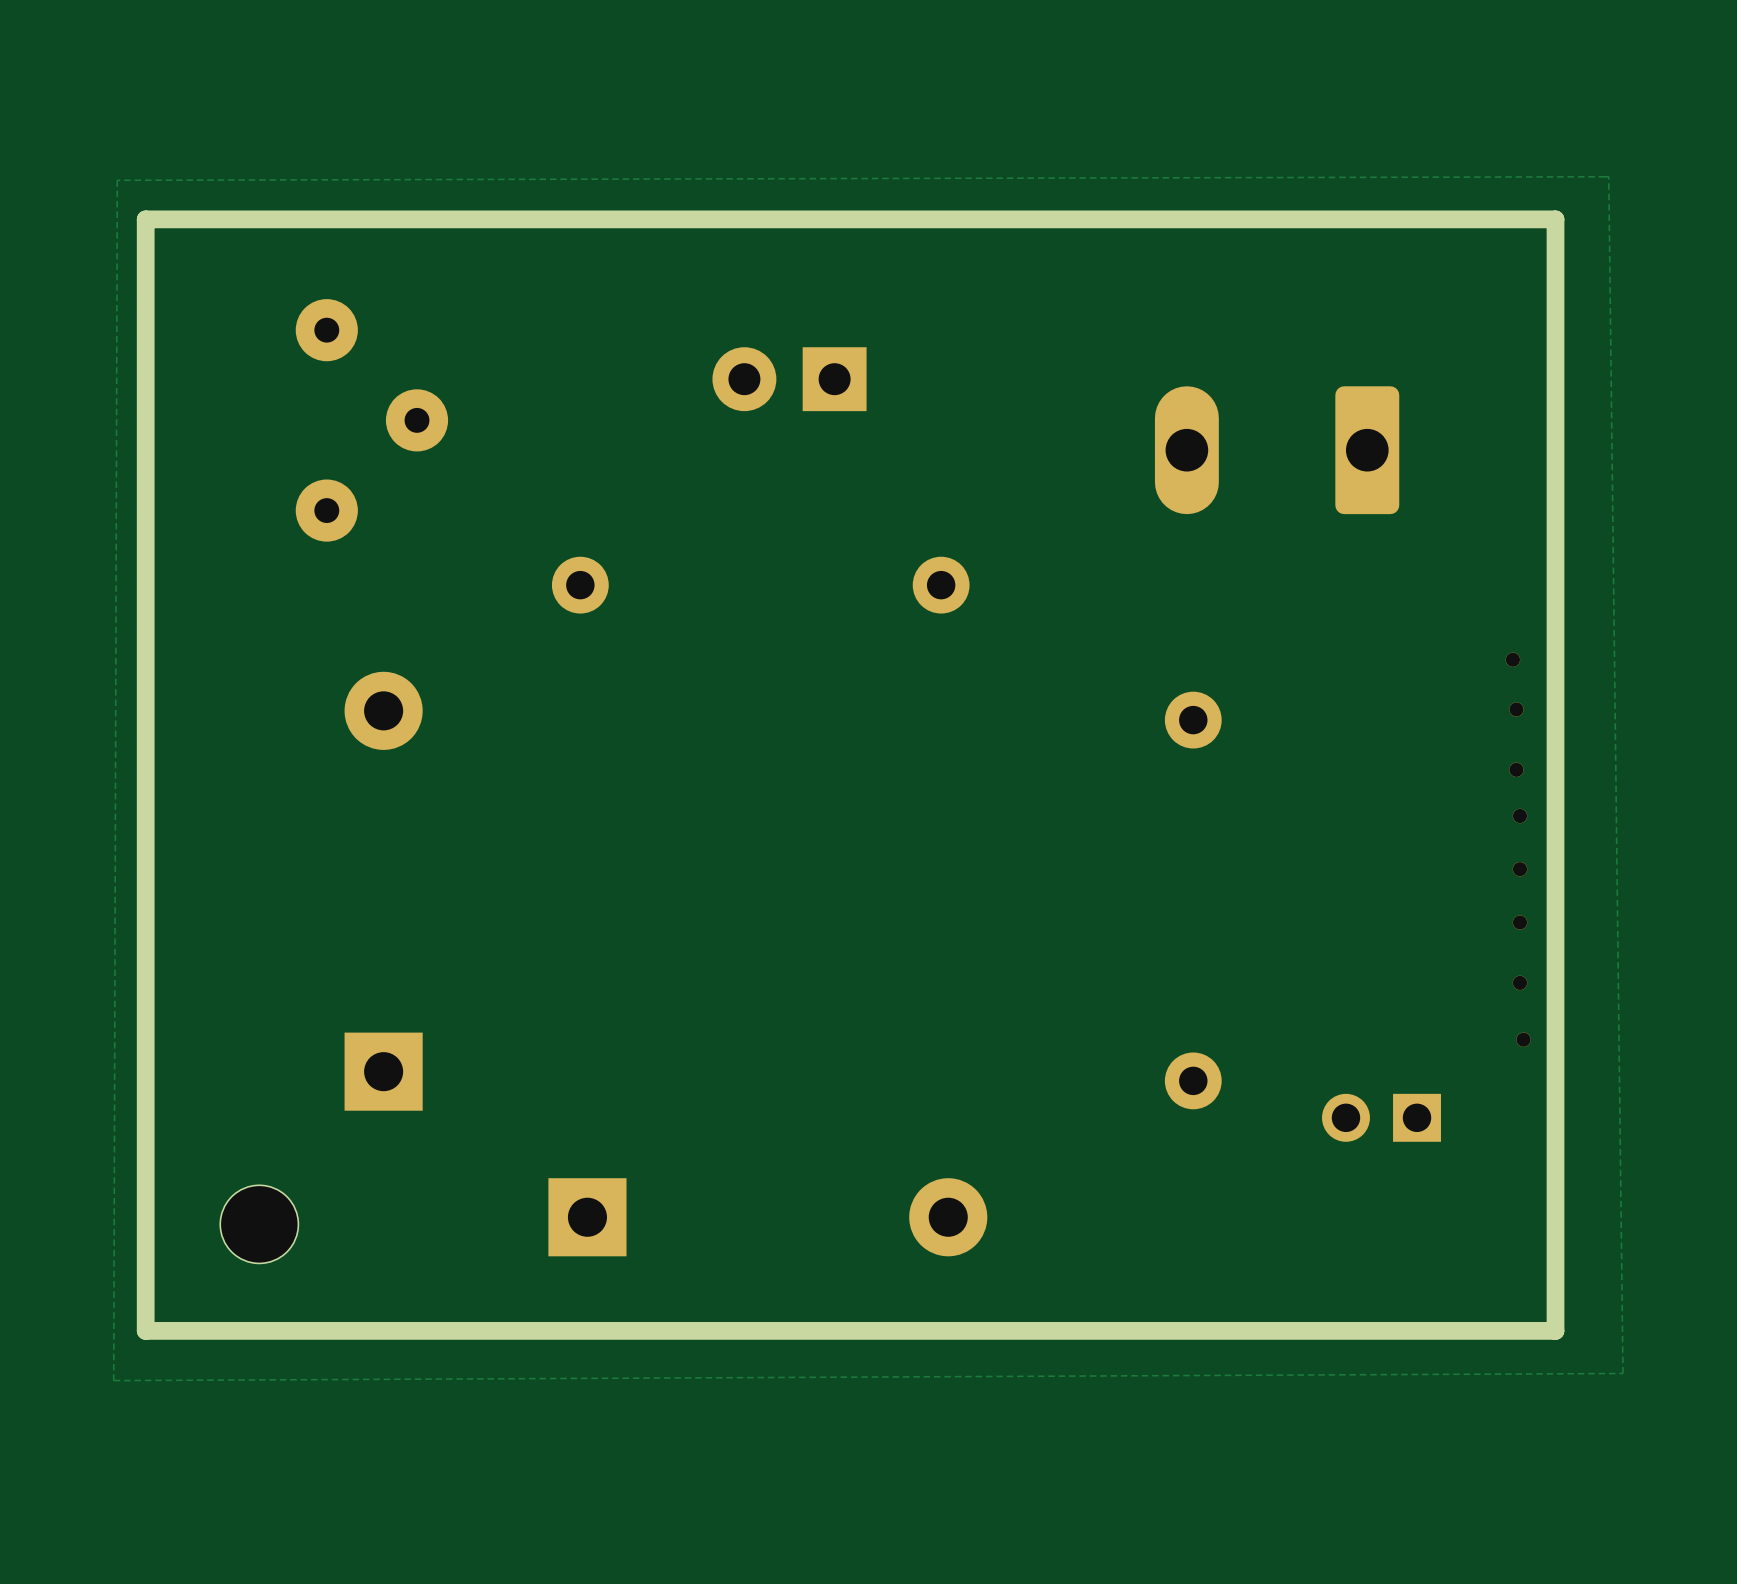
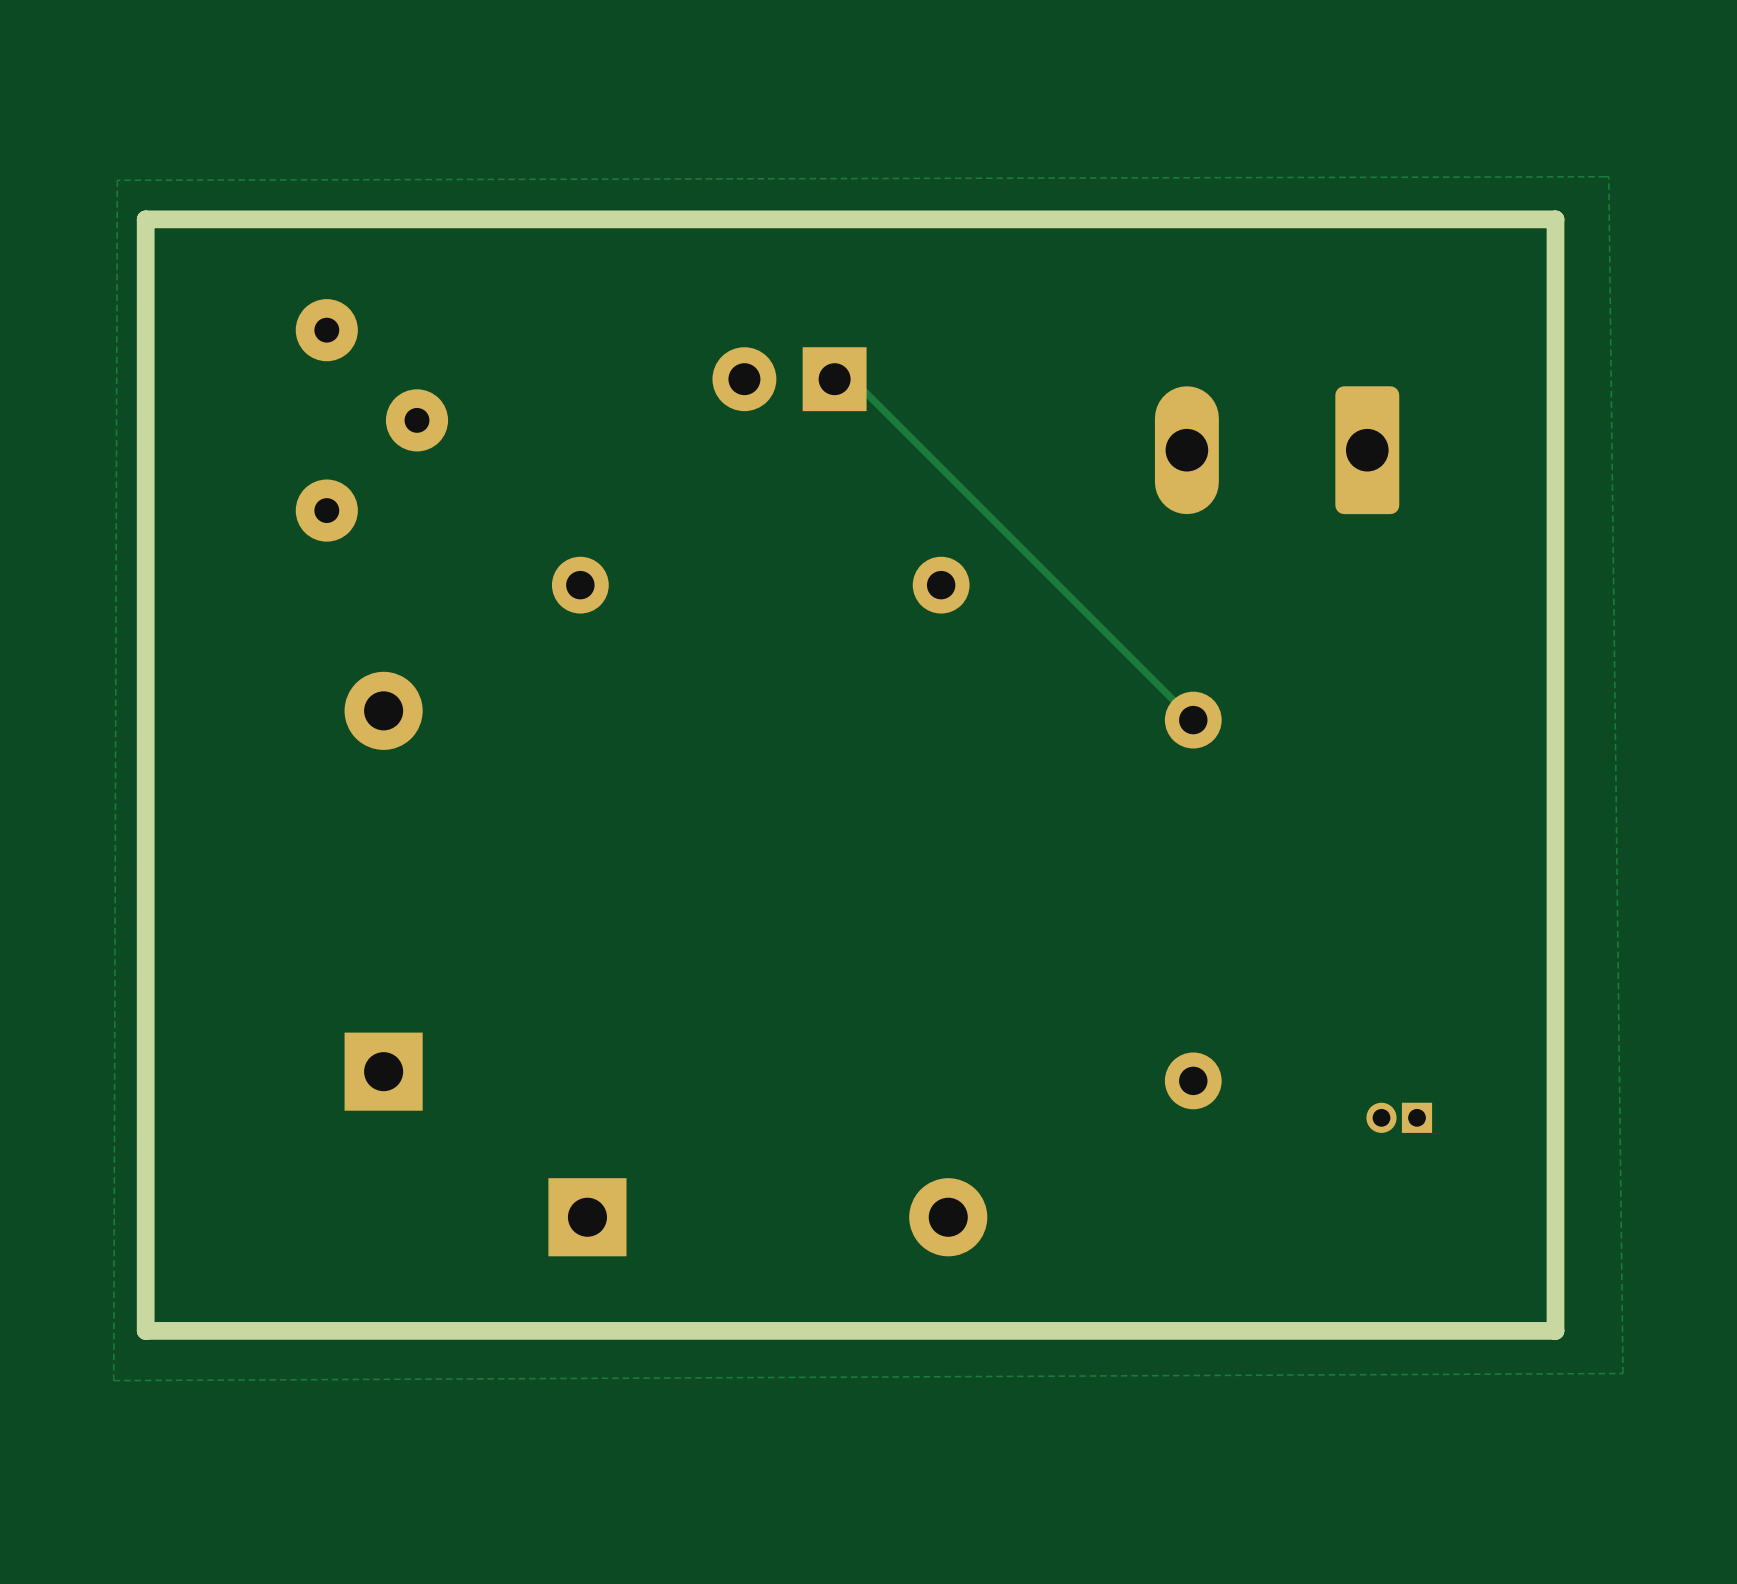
track: none -> (834, 379) (852, 379) (1193, 720)
via: (1512, 659) -> none
via: (1516, 709) -> none
via: (1516, 769) -> none
via: (1519, 815) -> none
via: (1519, 869) -> none
via: (1519, 922) -> none
via: (1519, 982) -> none
via: (1523, 1039) -> none
part footprint: [1322, 1093, 1441, 1142] -> [1366, 1102, 1433, 1133]
part: (259, 1224) -> none

